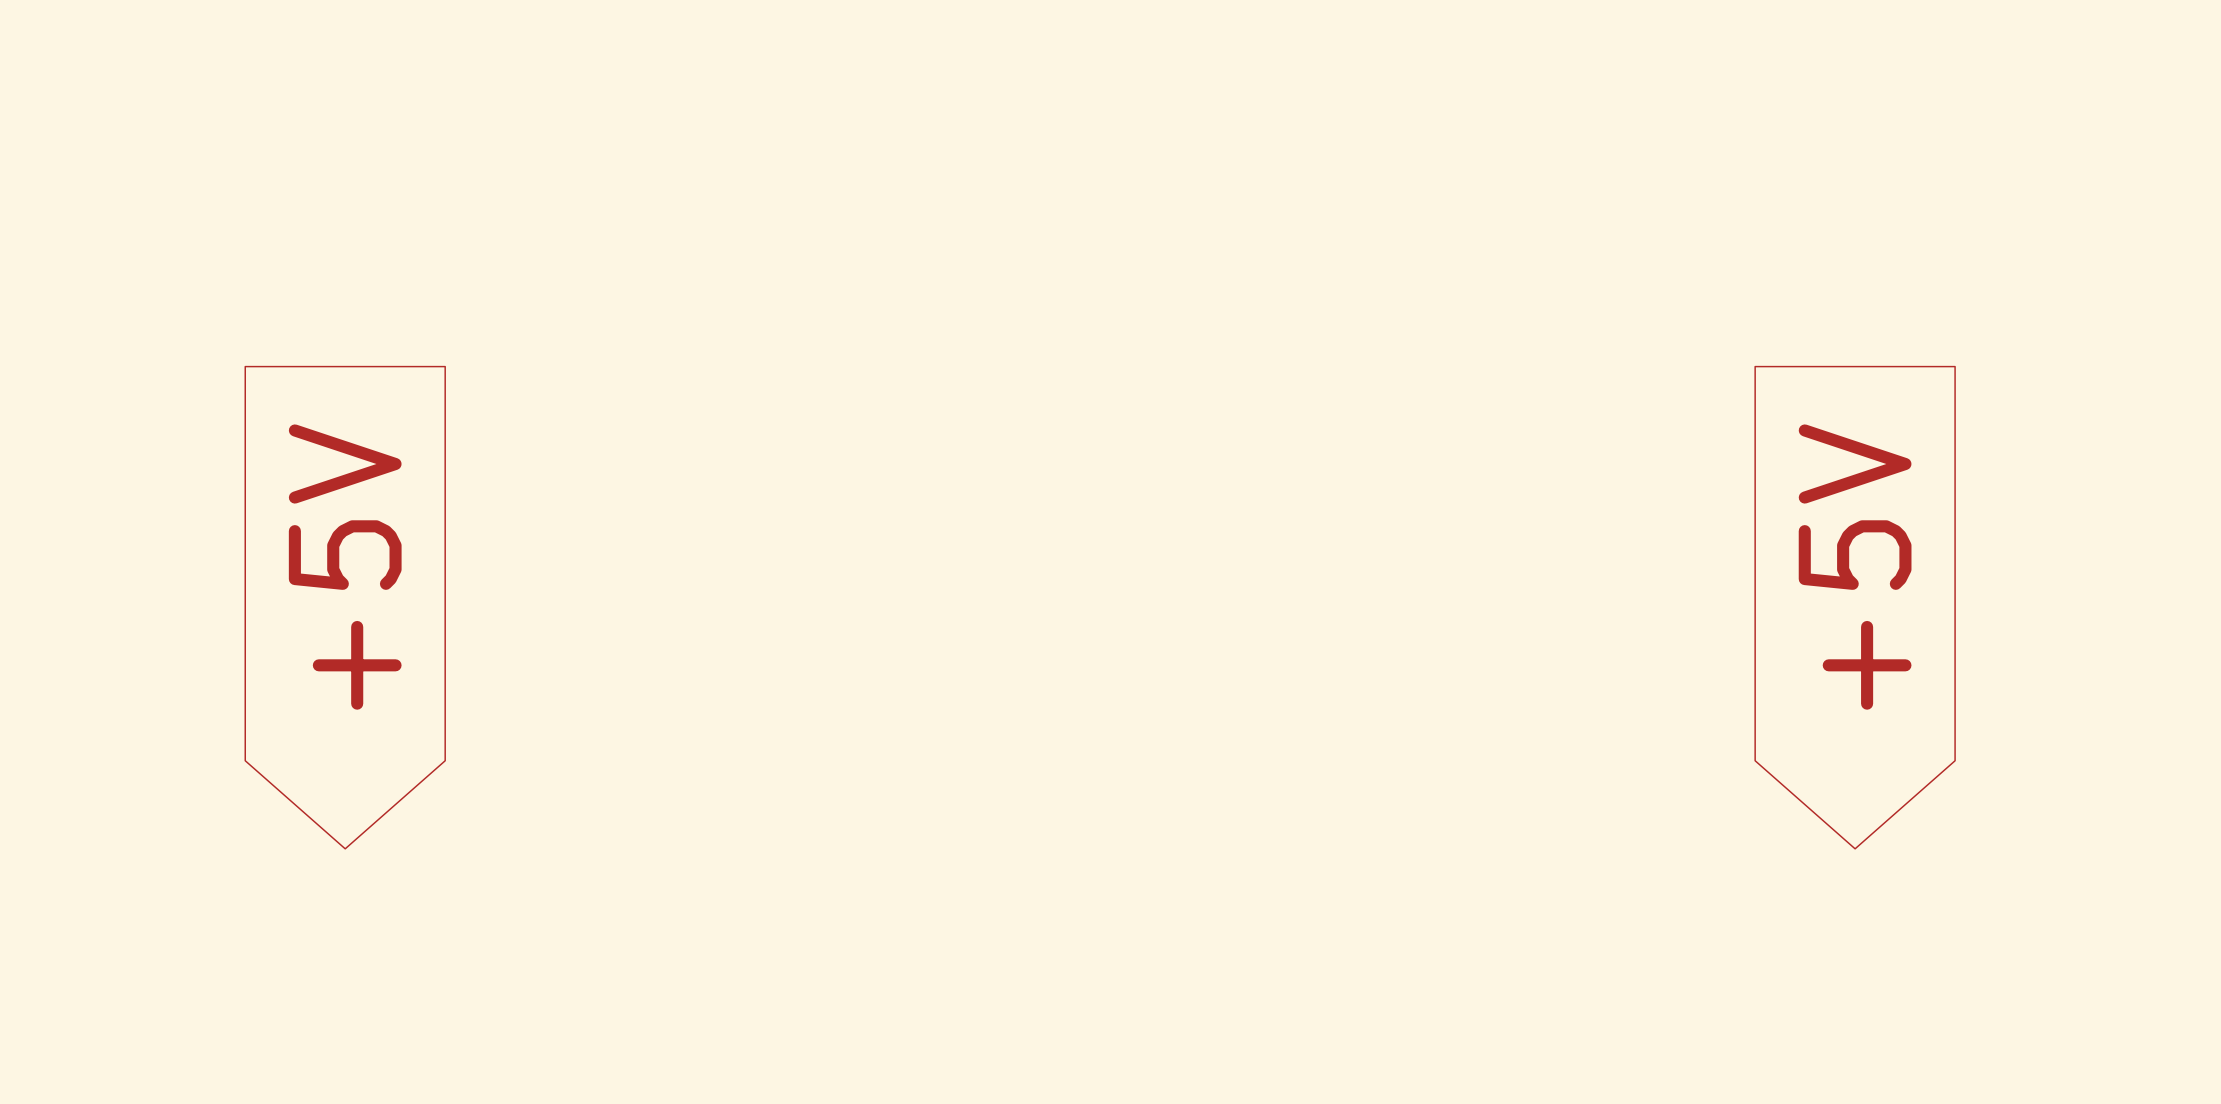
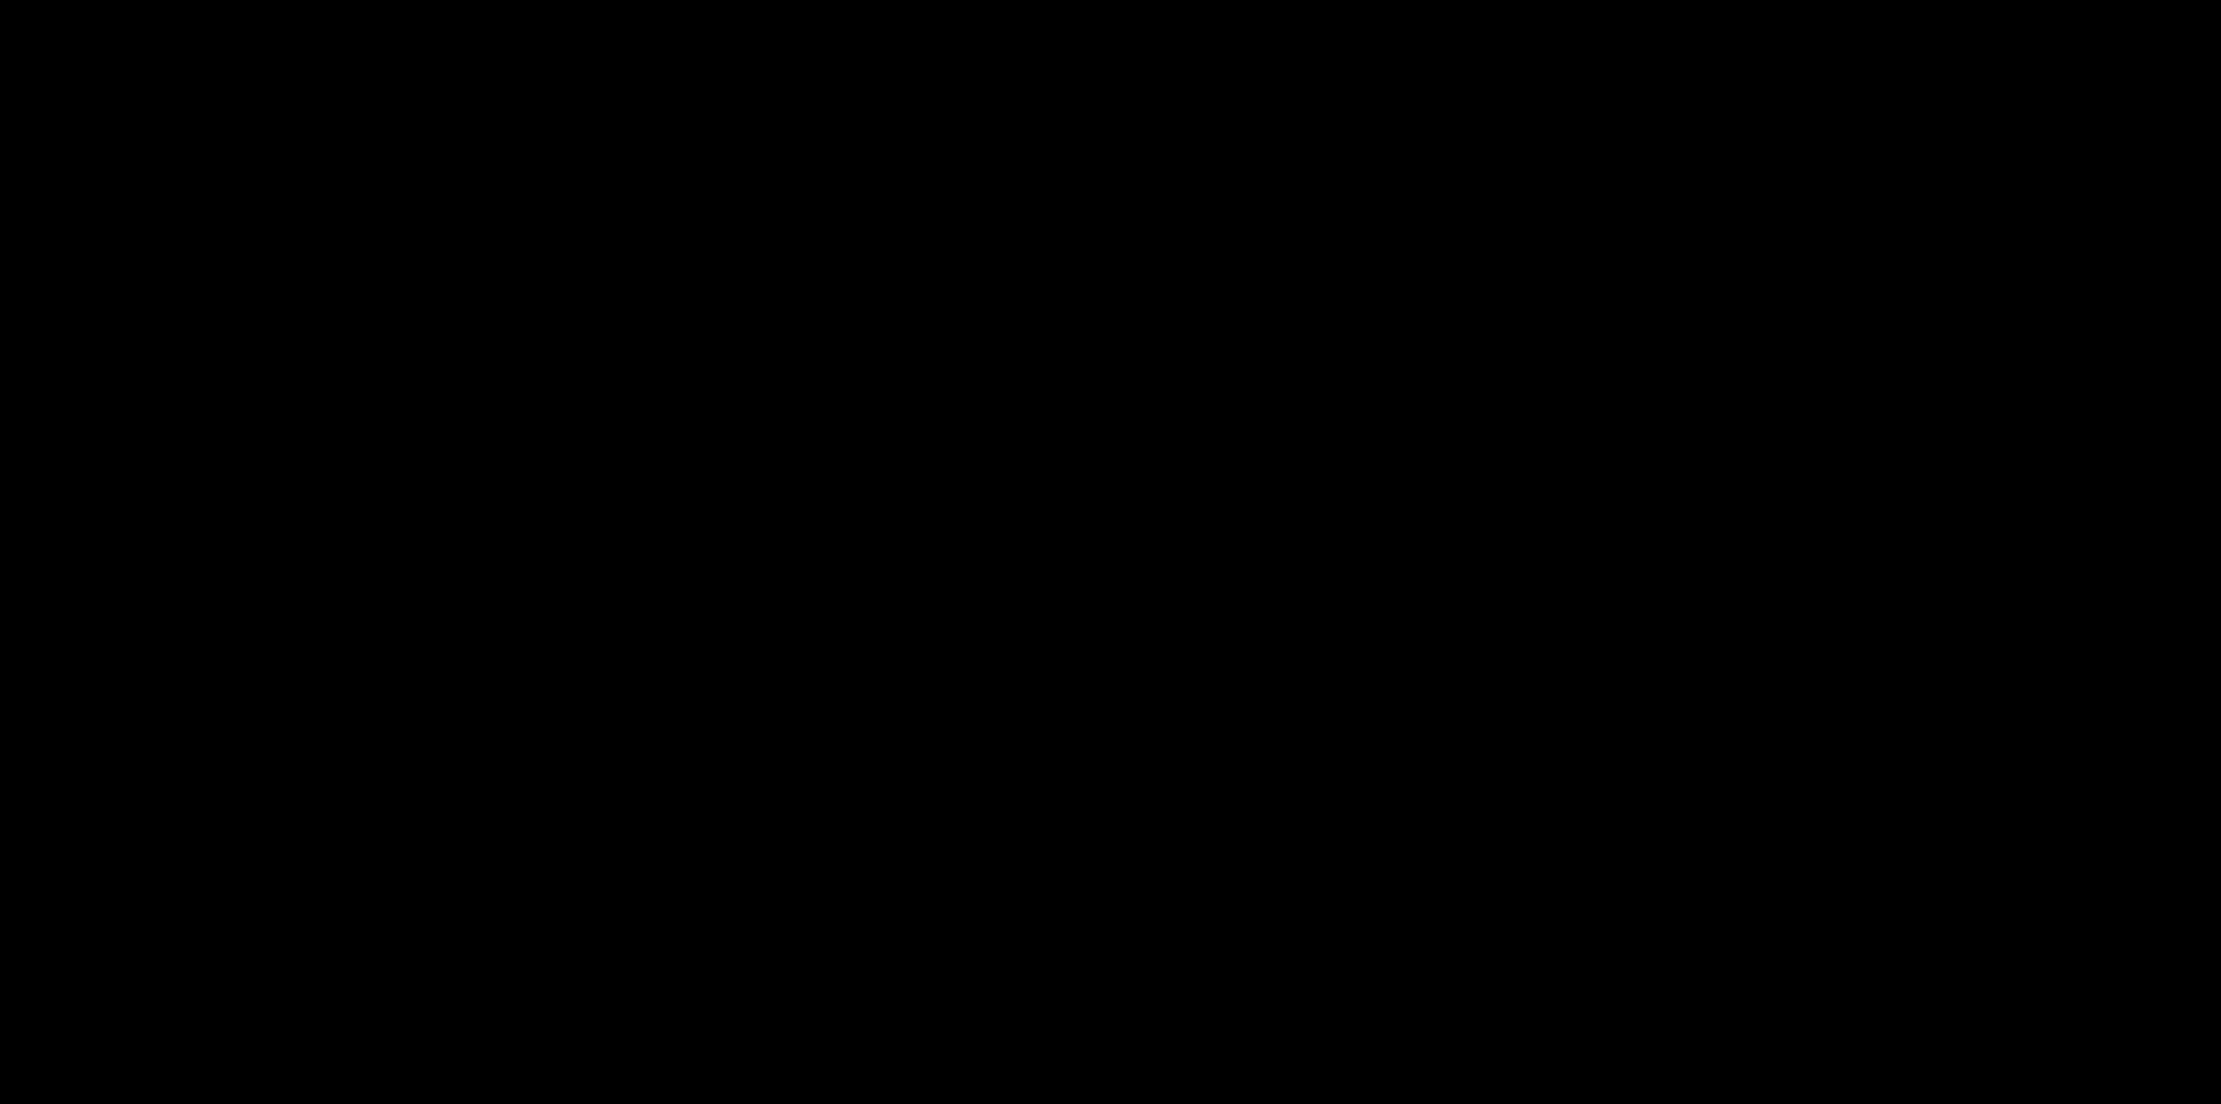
global label: +5V (345, 567) -> none
global label: +5V (1855, 567) -> none

